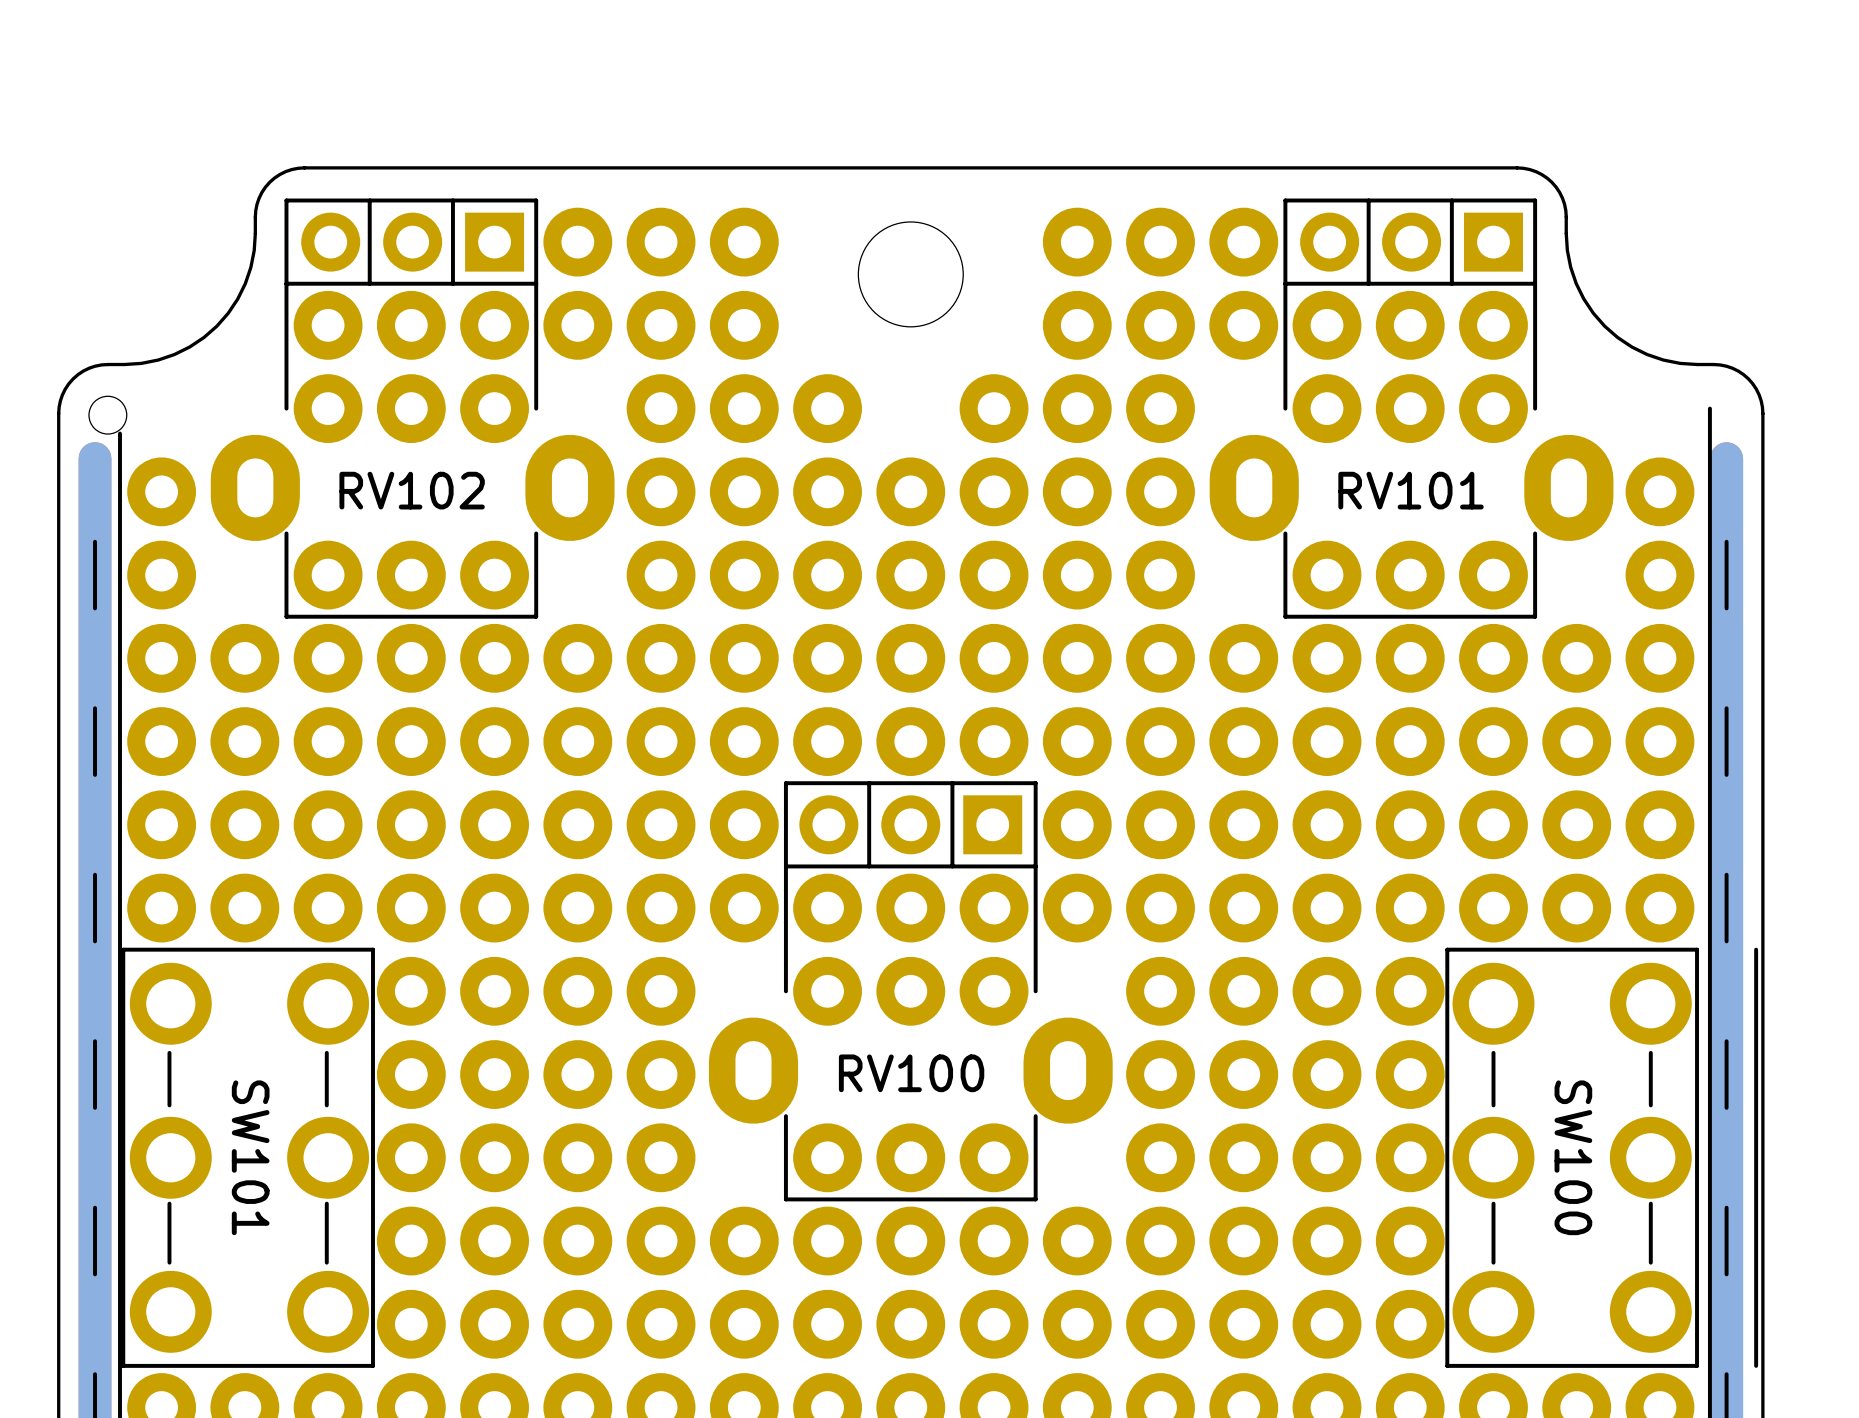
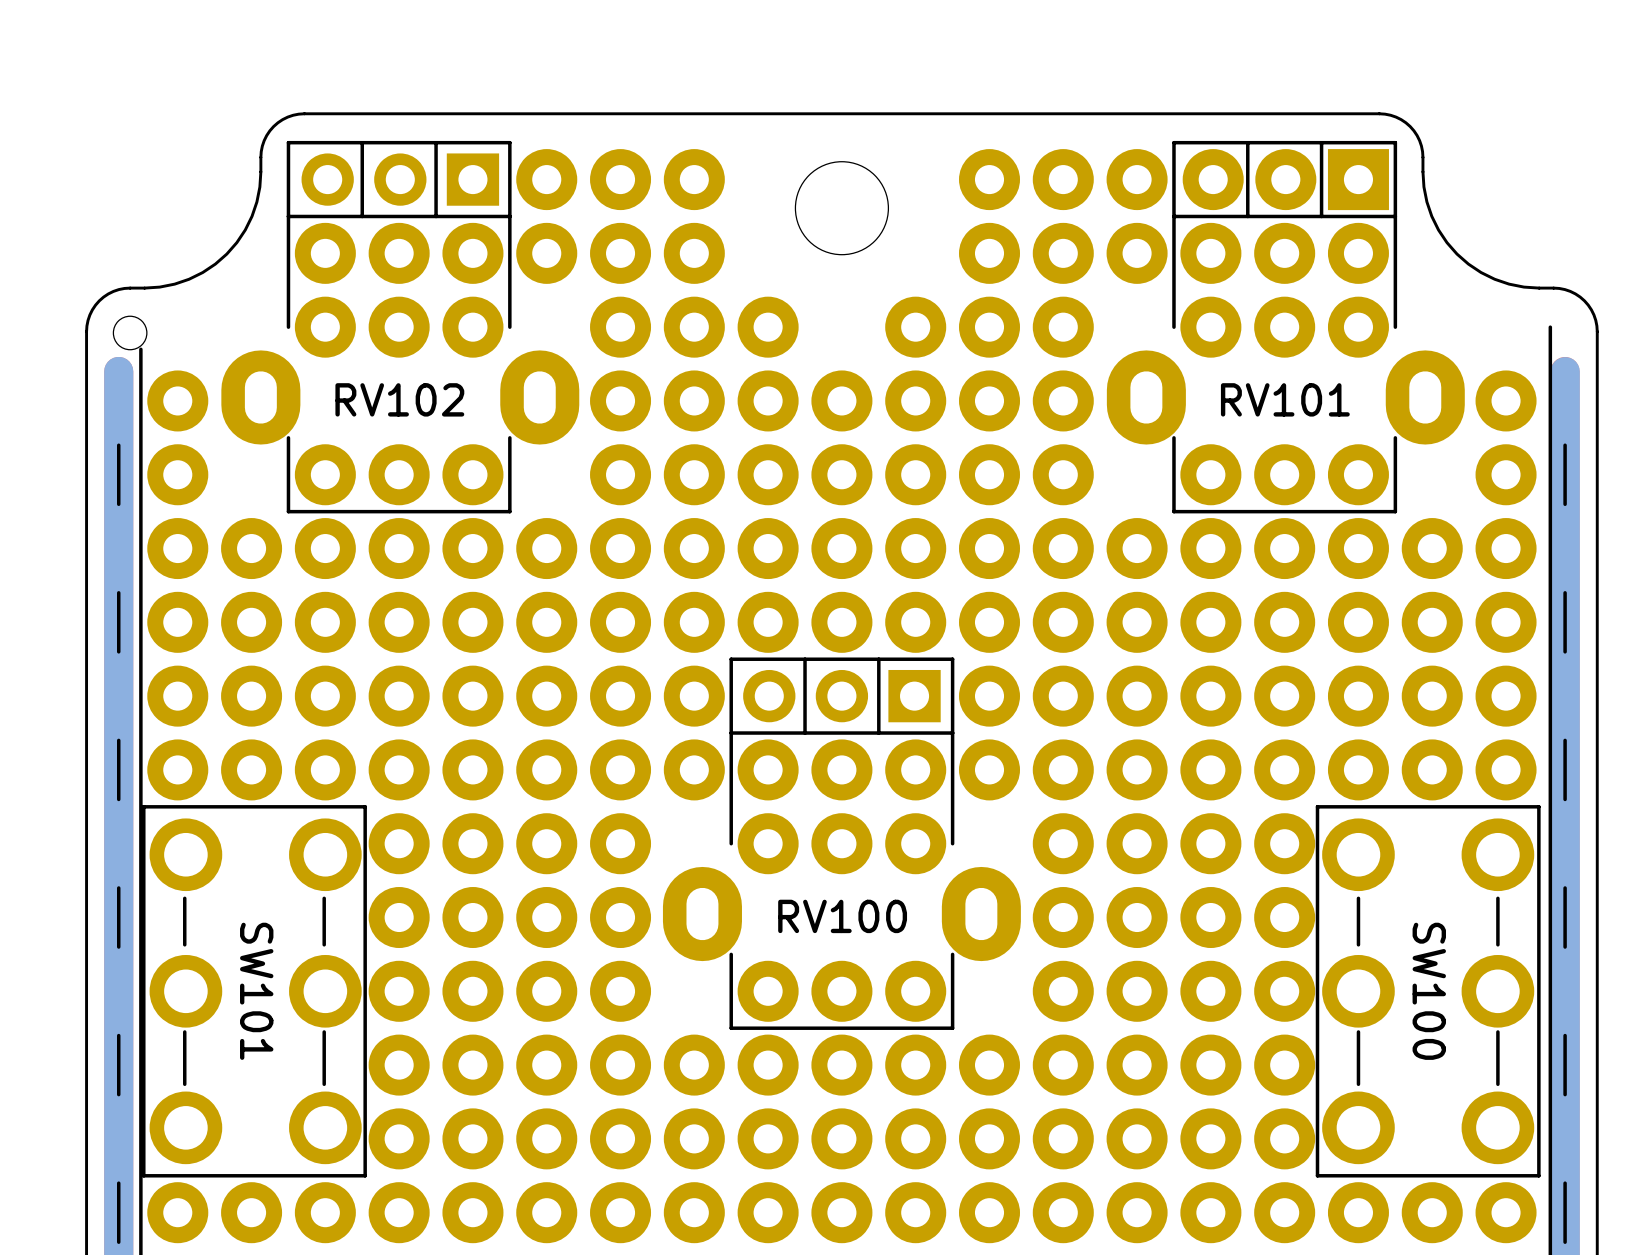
RV101 footprint: [1209, 212, 1614, 542] -> [1106, 149, 1465, 445]
line: (1756, 949) (1756, 1365) -> none

